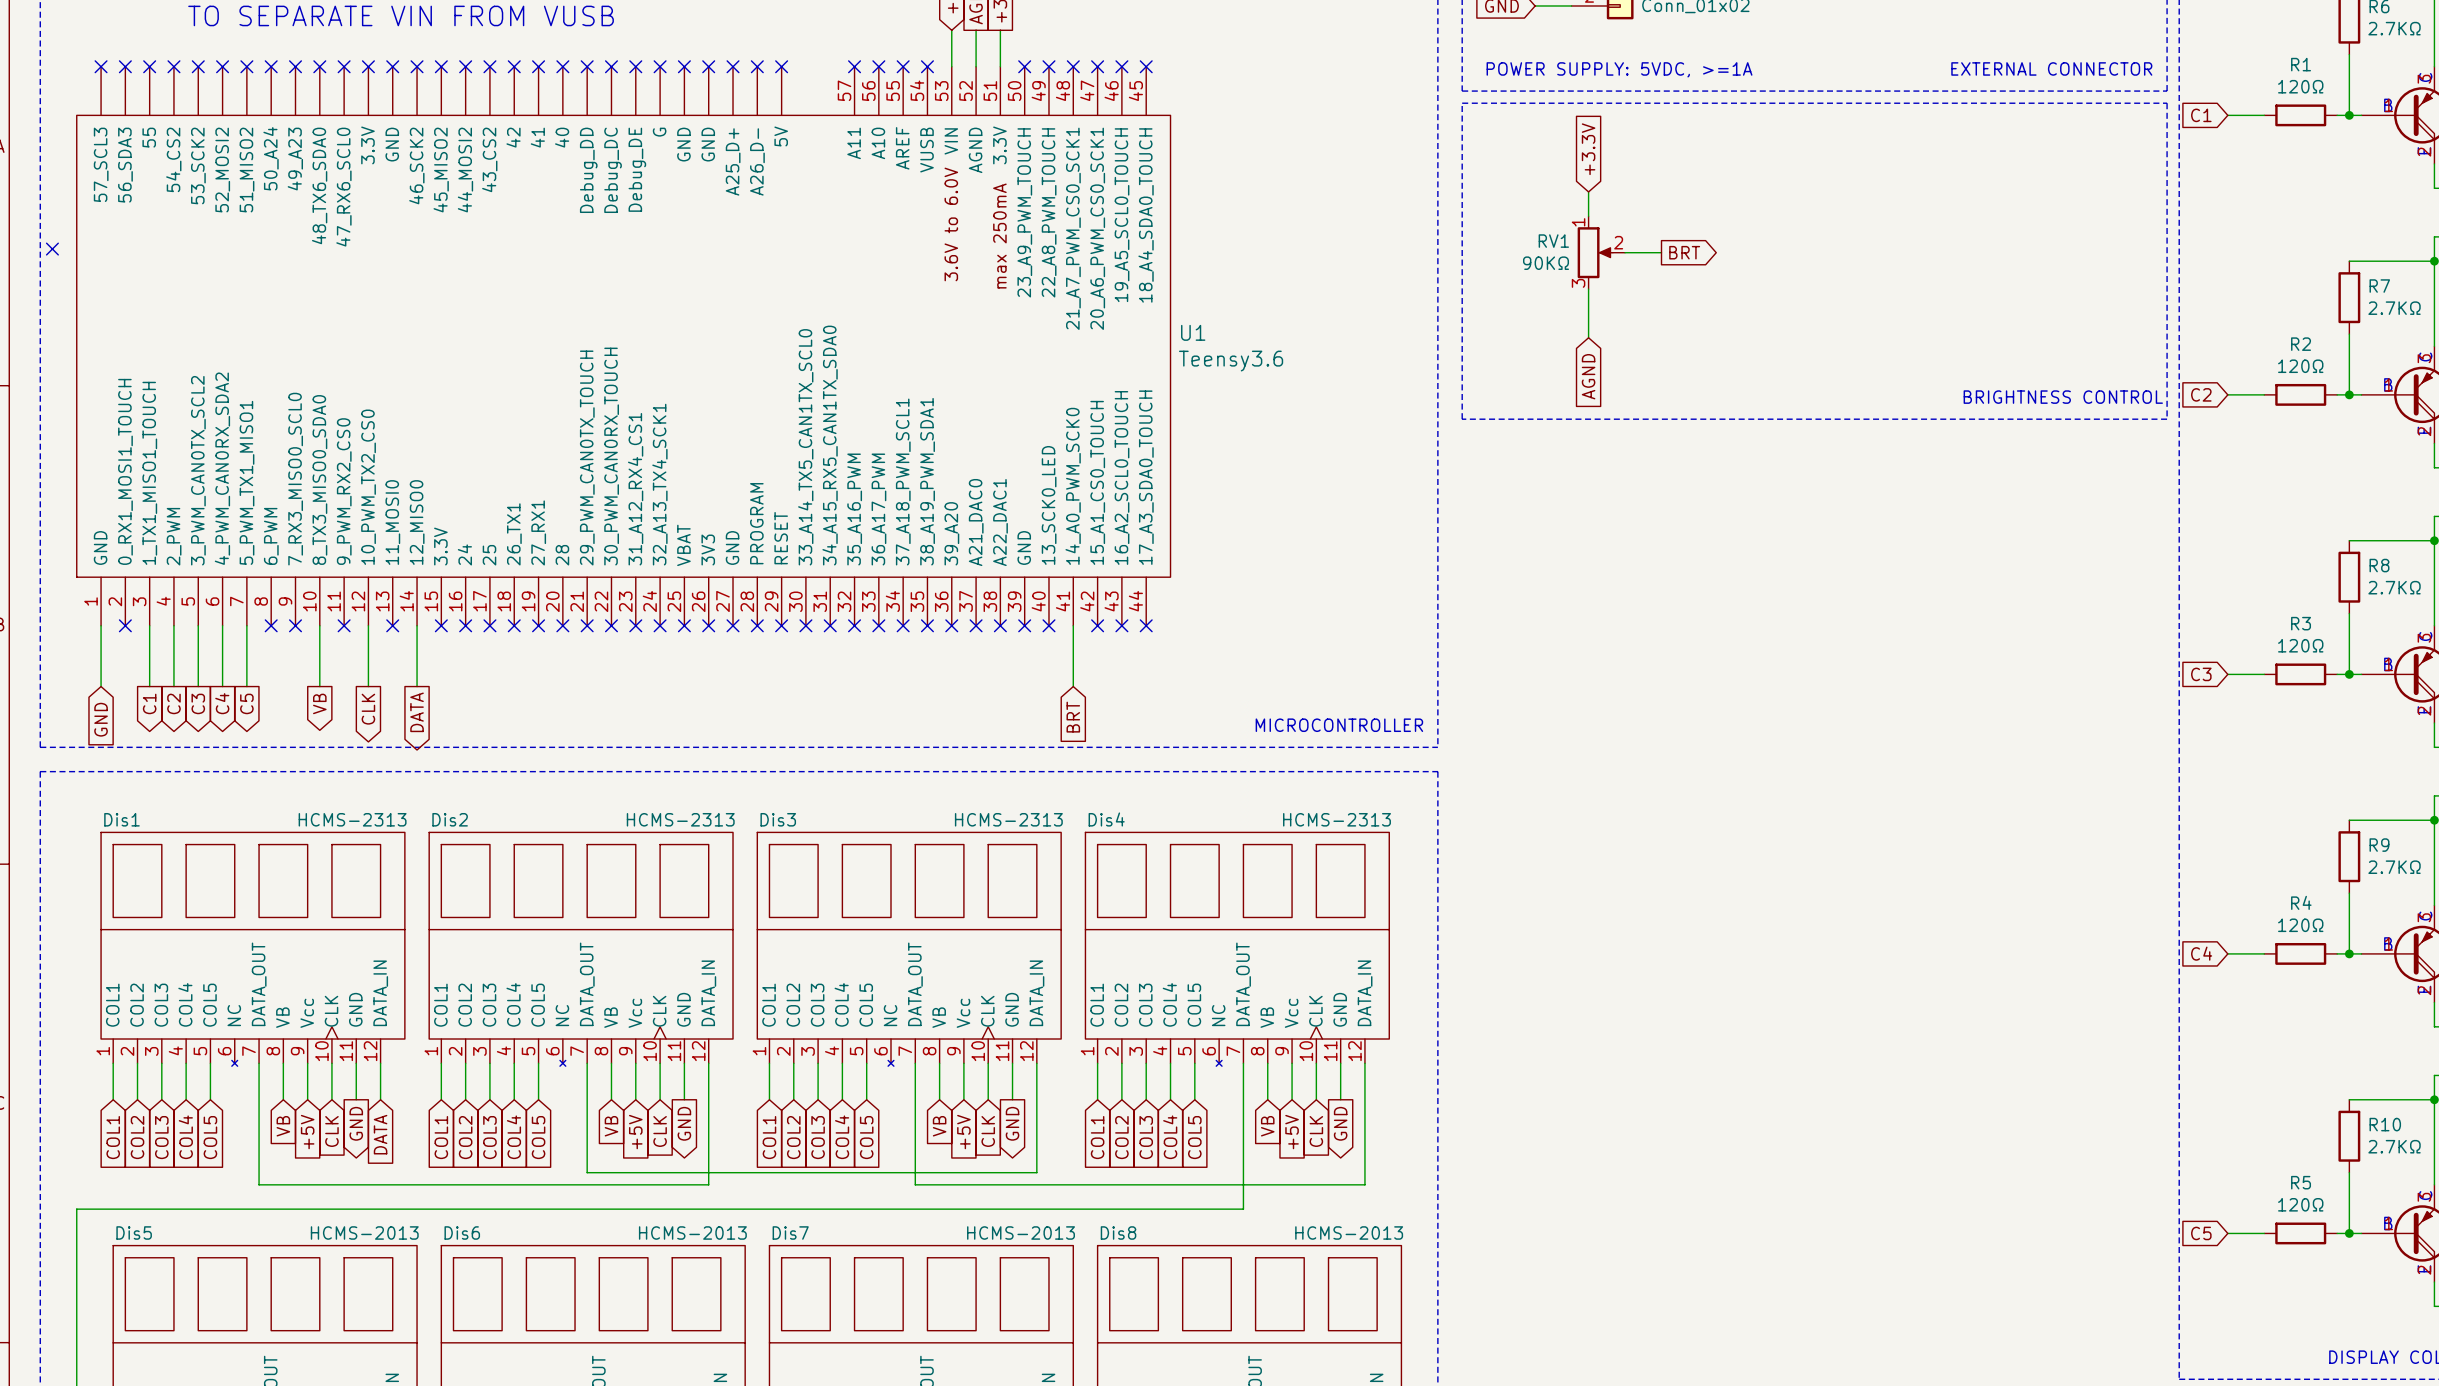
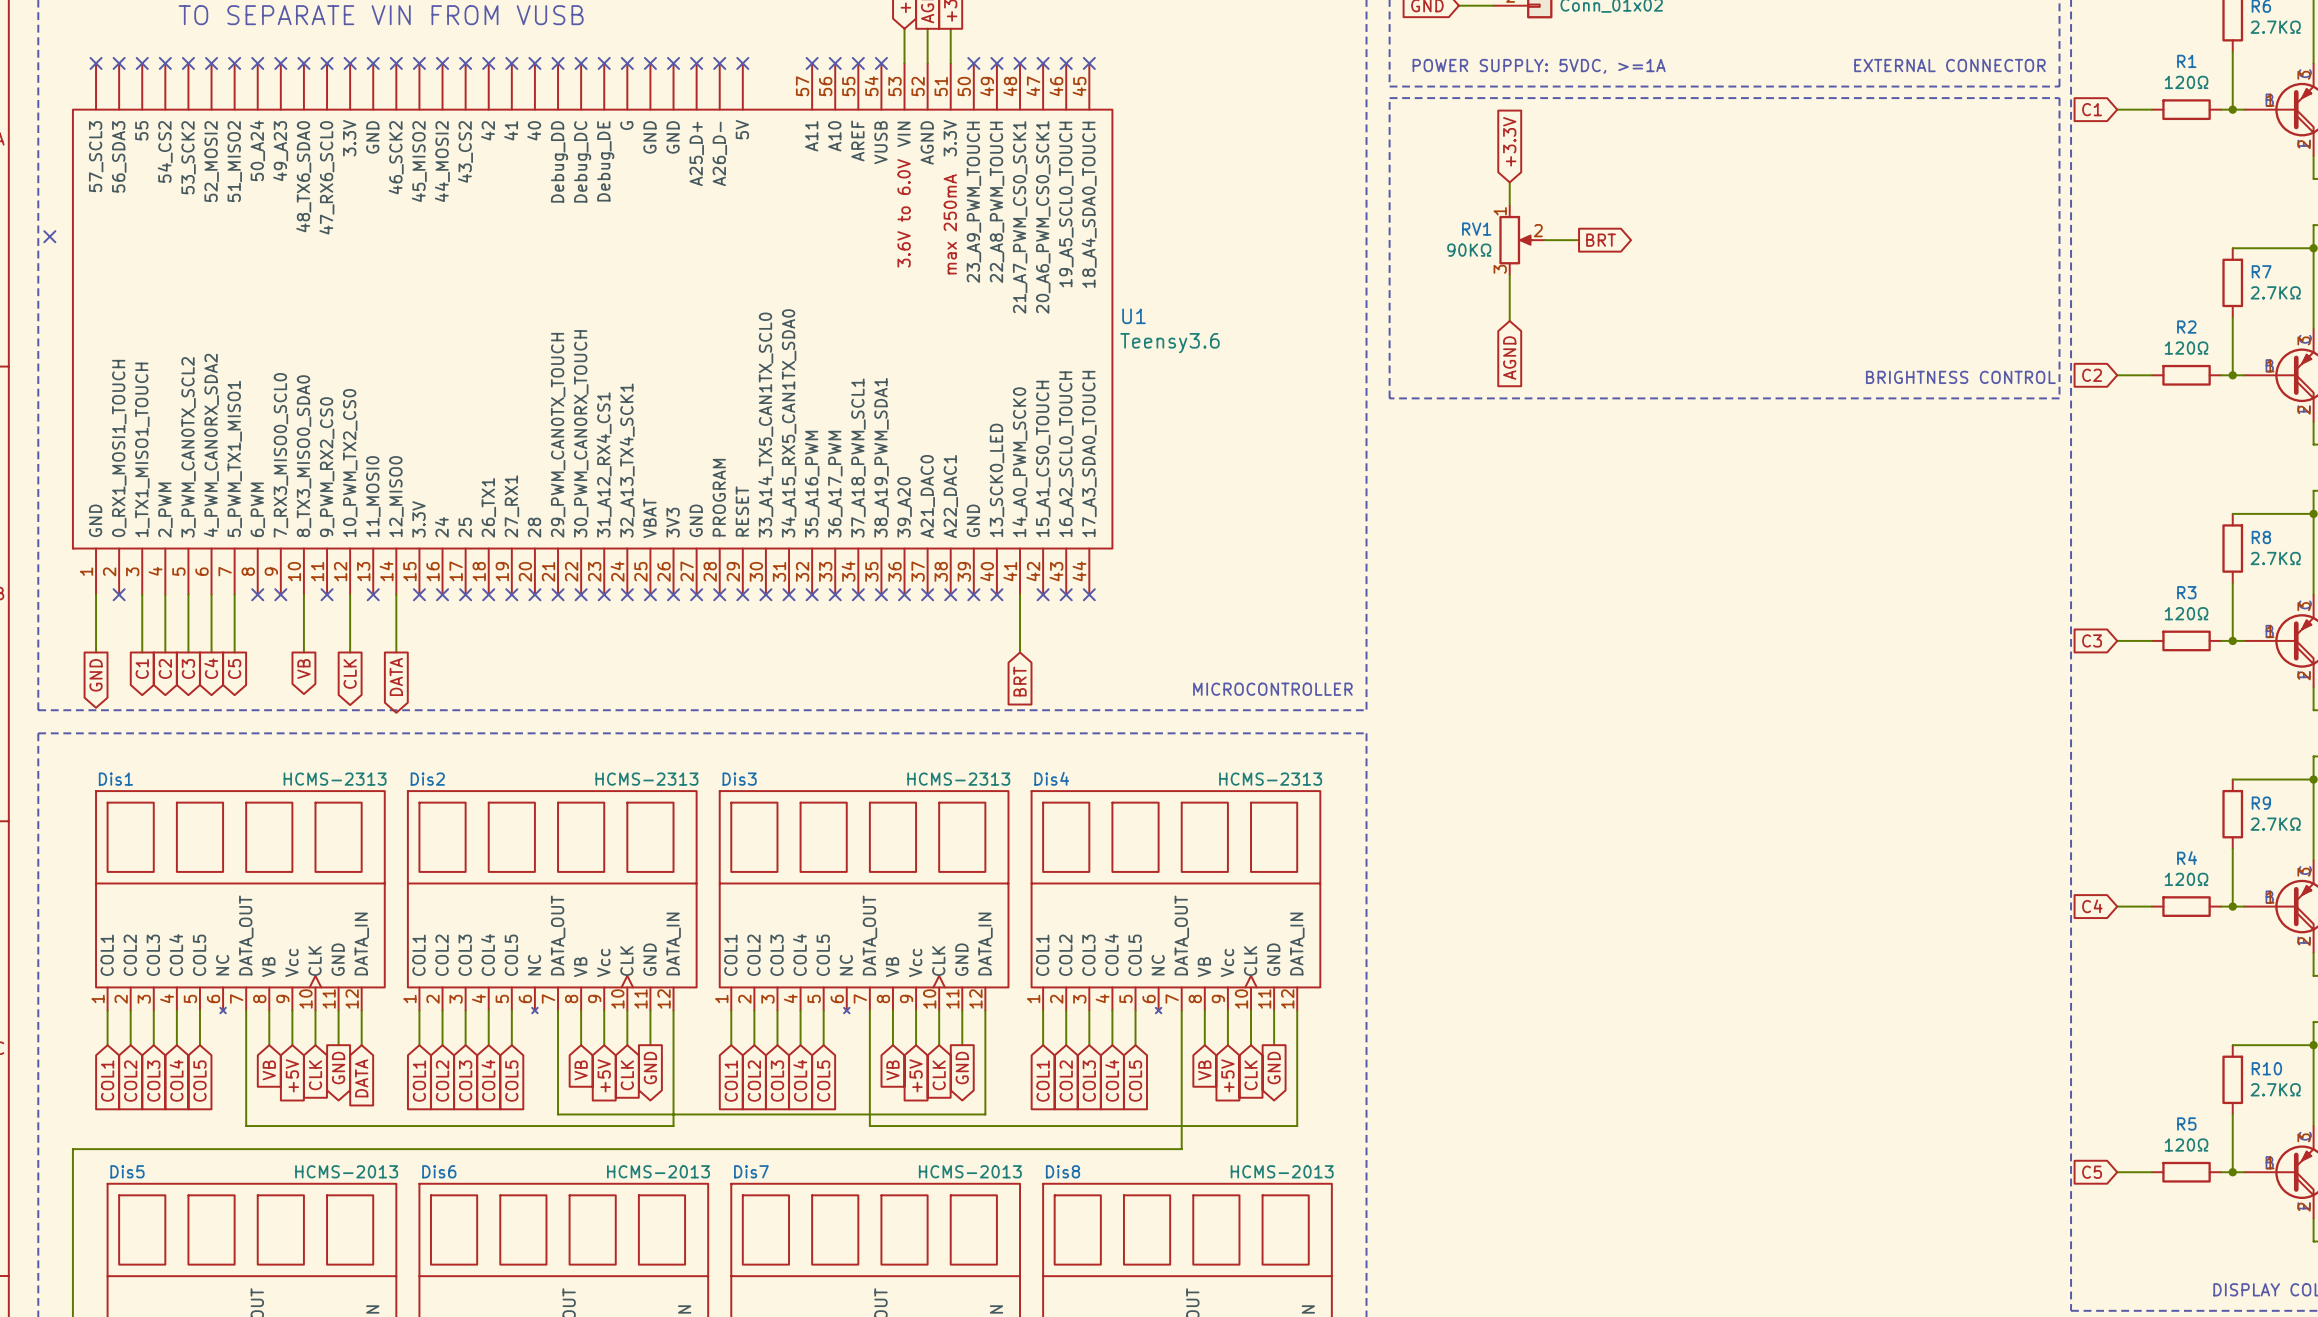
global label shape: input (101, 719) -> output (96, 675)

